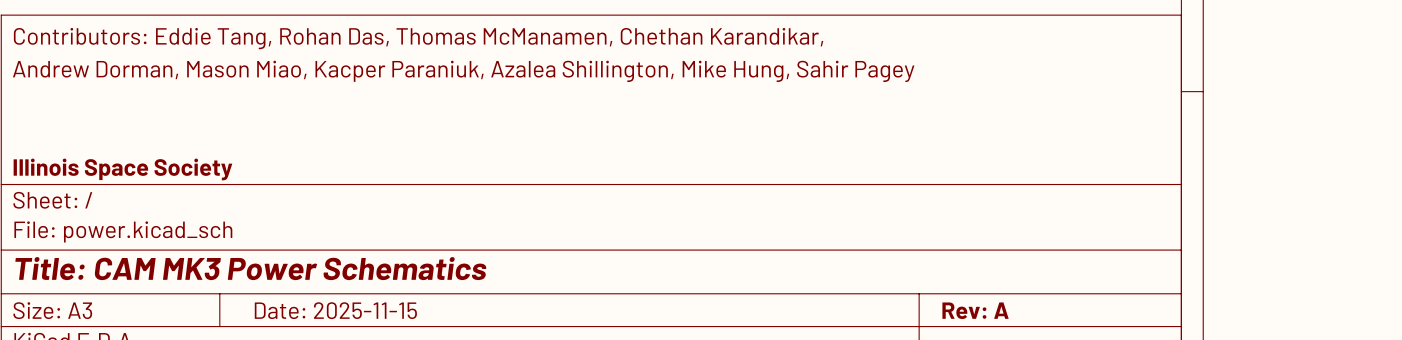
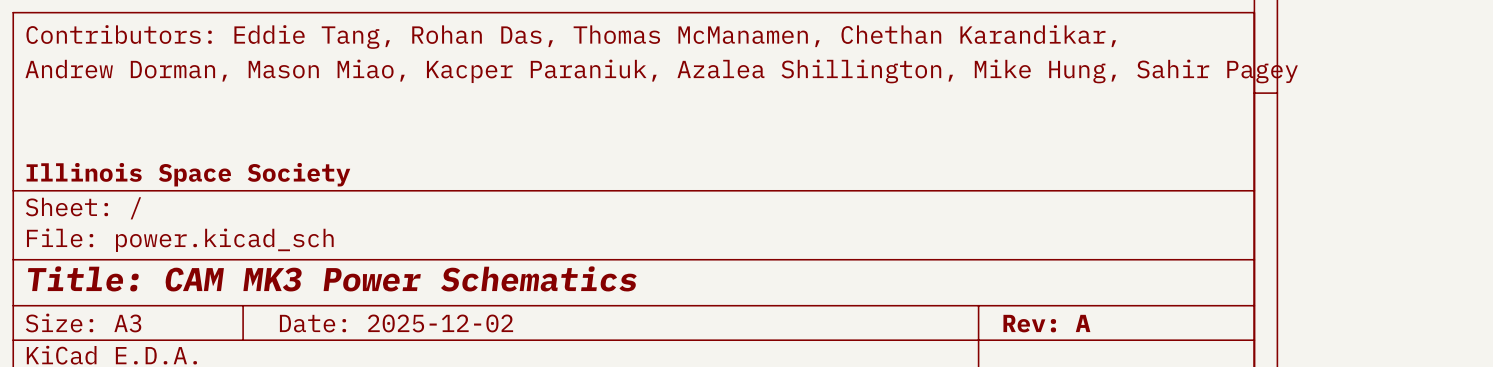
title block: Date: 2025-11-15 (335, 310) -> Date: 2025-12-02 (396, 323)

